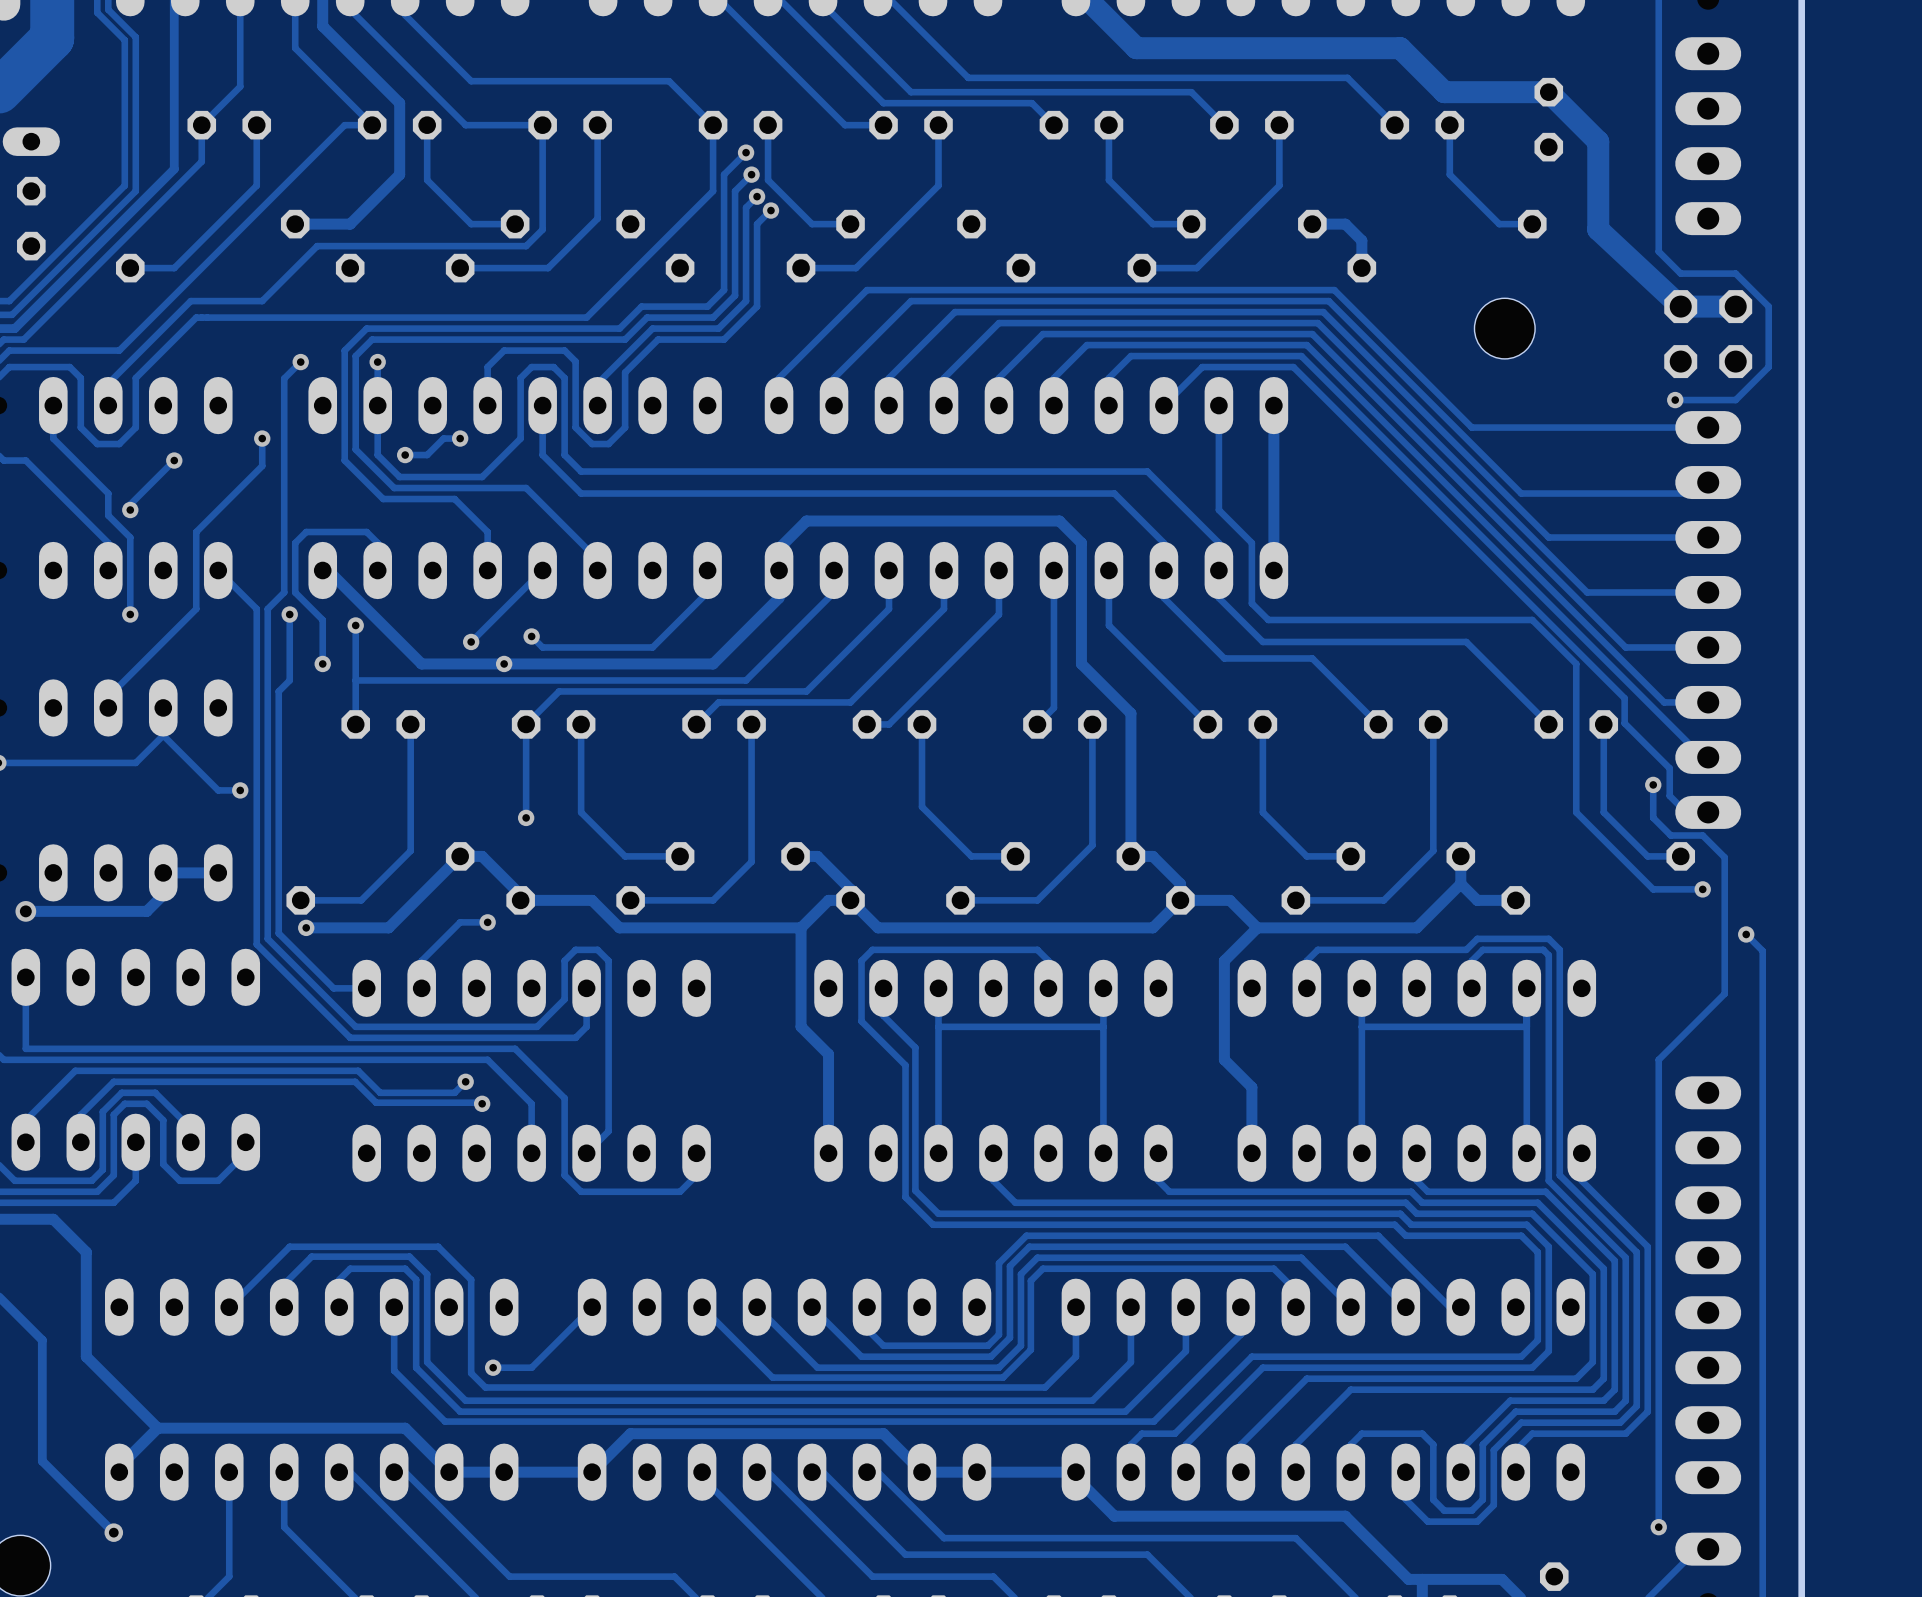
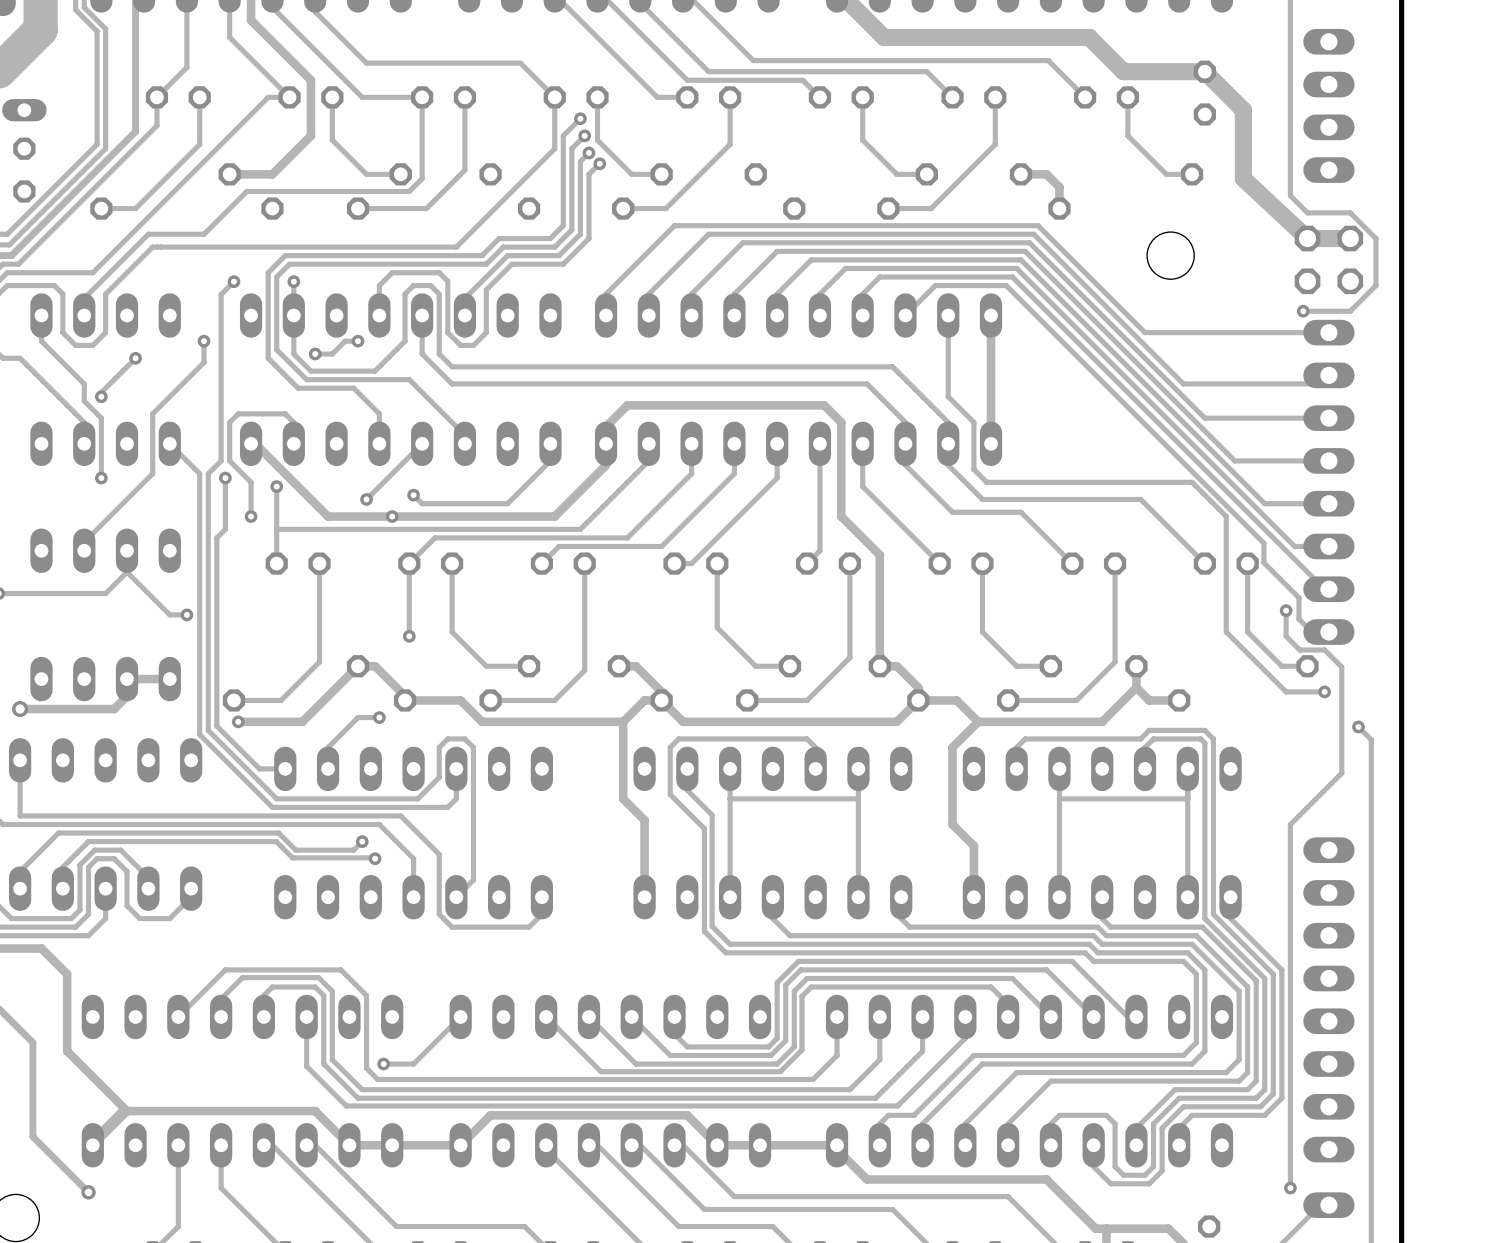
track: (86, 1351) (86, 1356) (157, 1428) -> (67, 1051) (127, 1111) (88, 1149)

